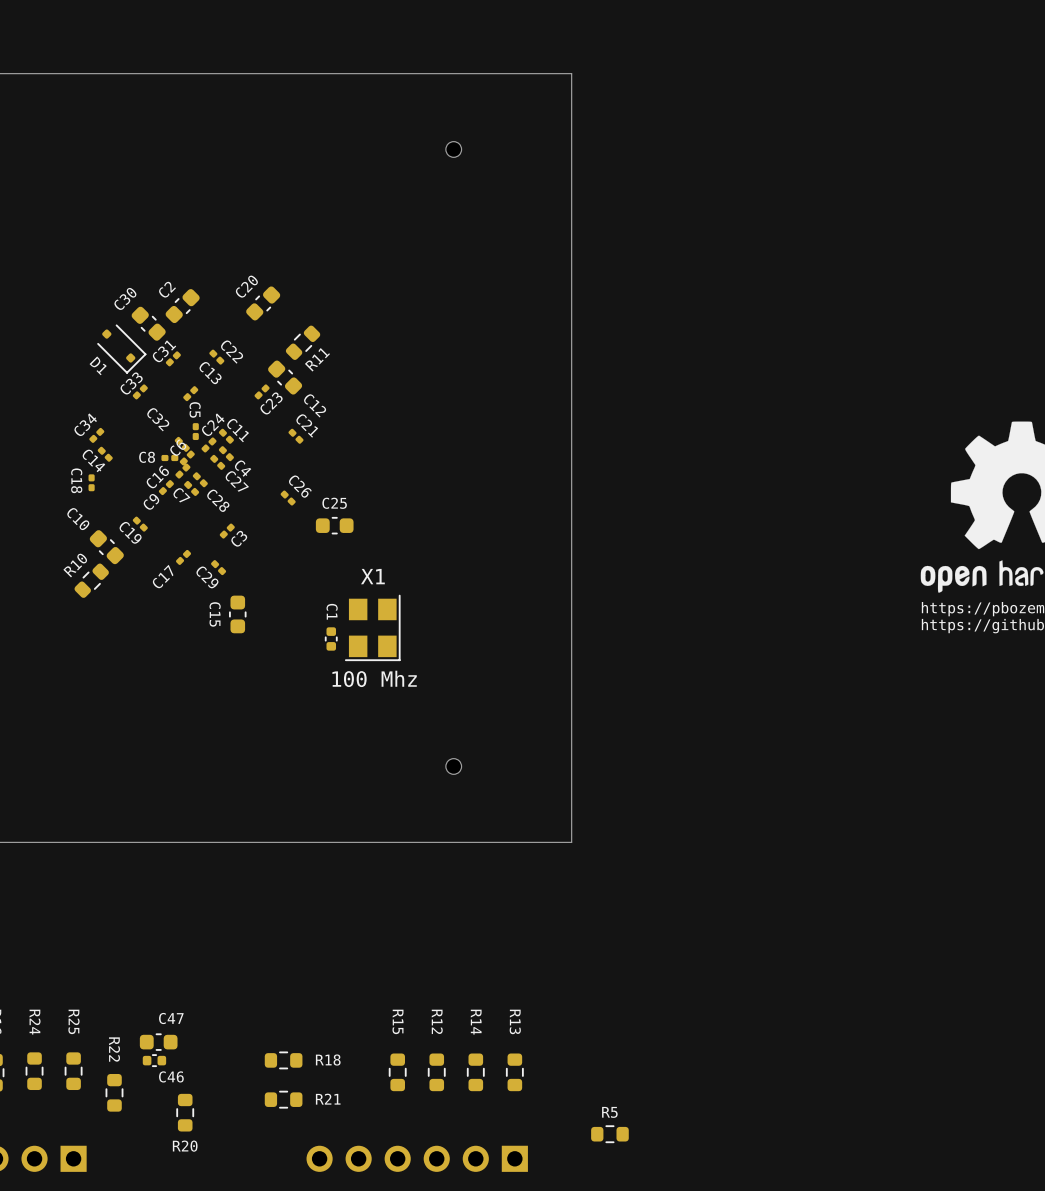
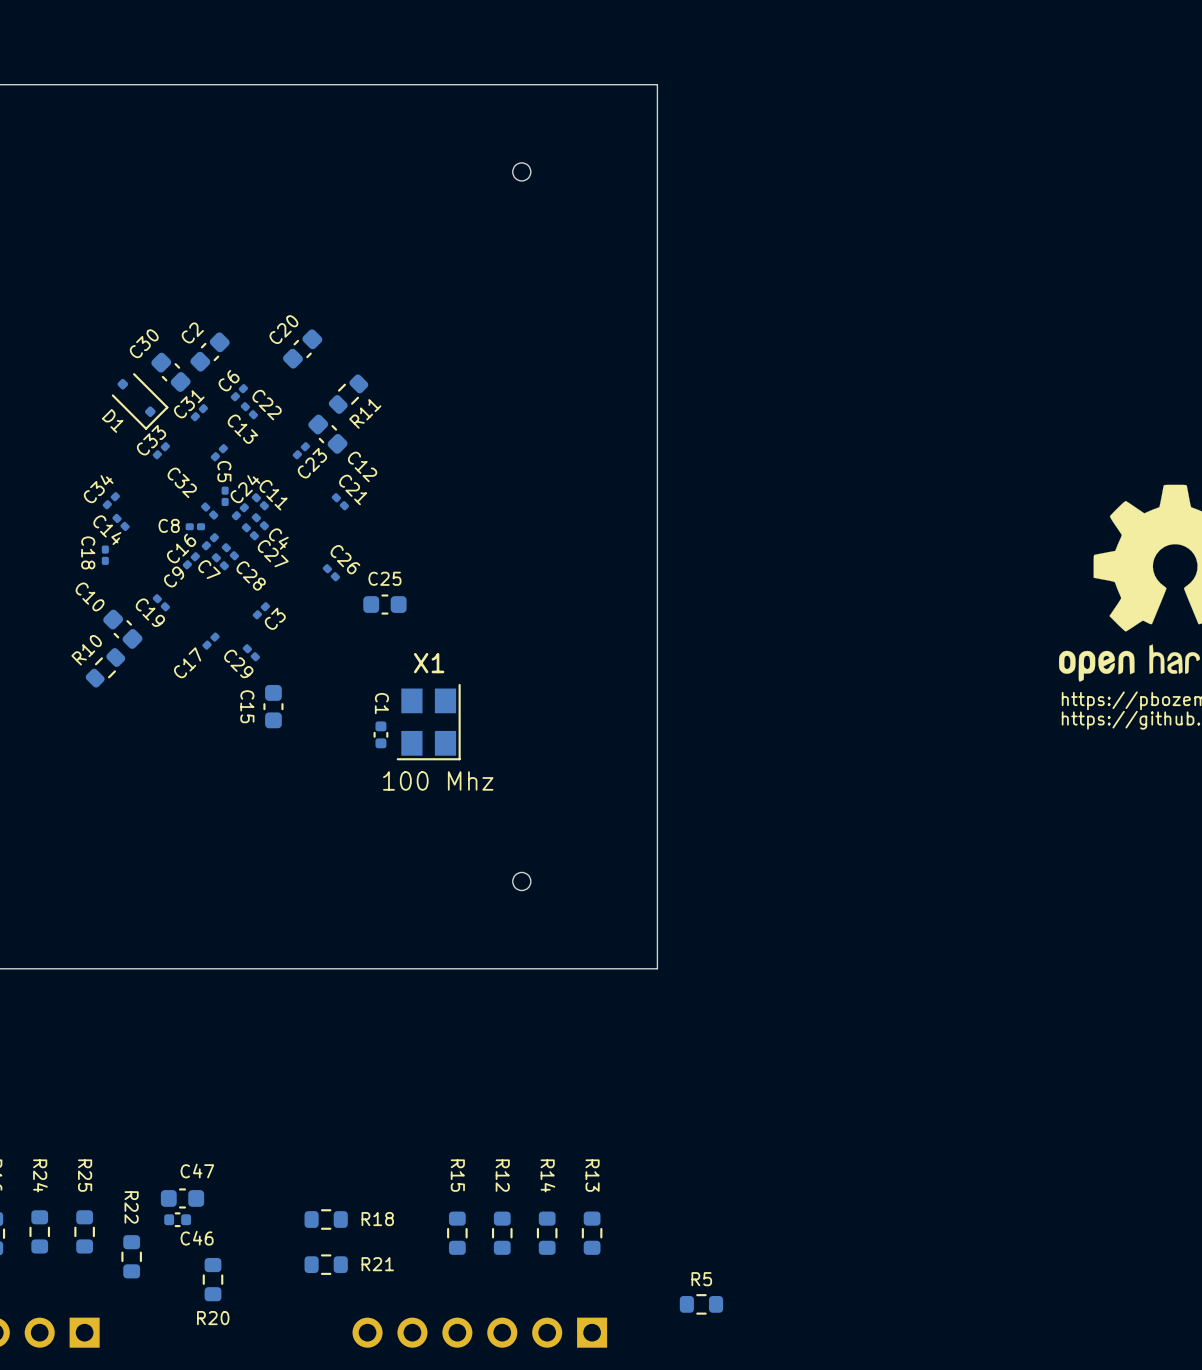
C6 position: (187, 458) -> (239, 392)

